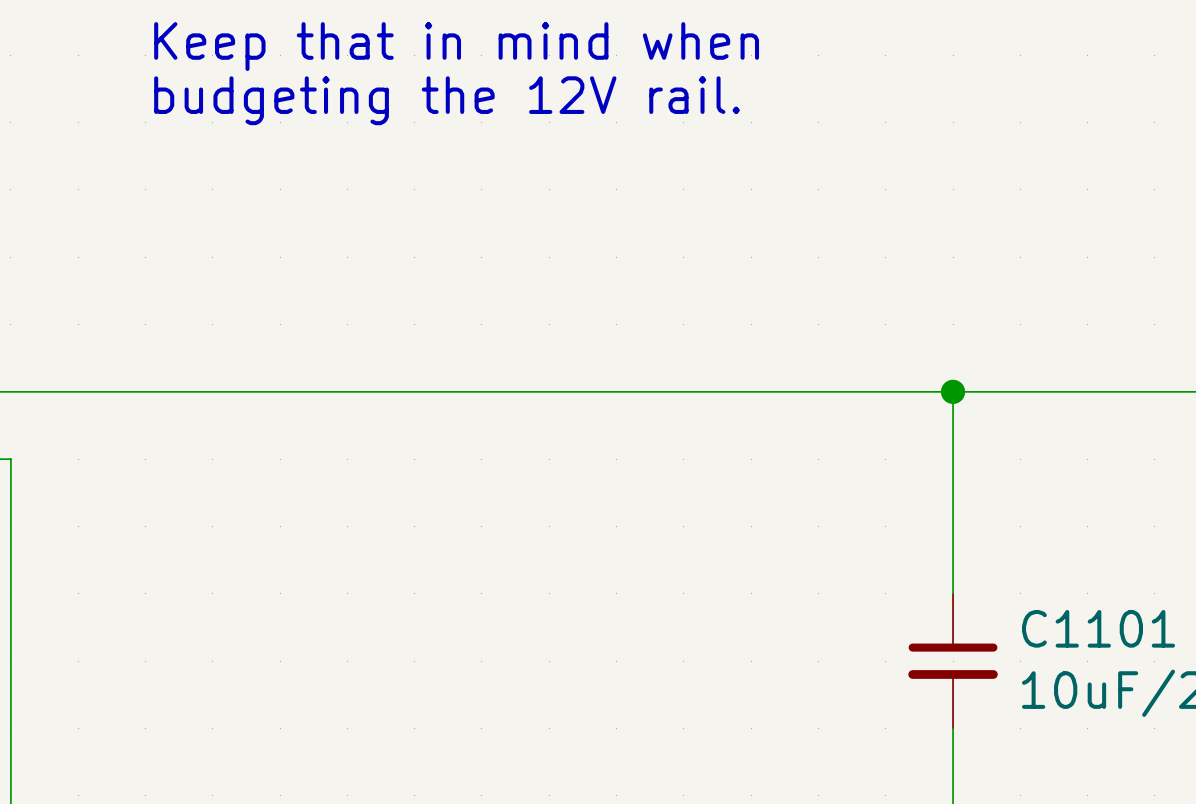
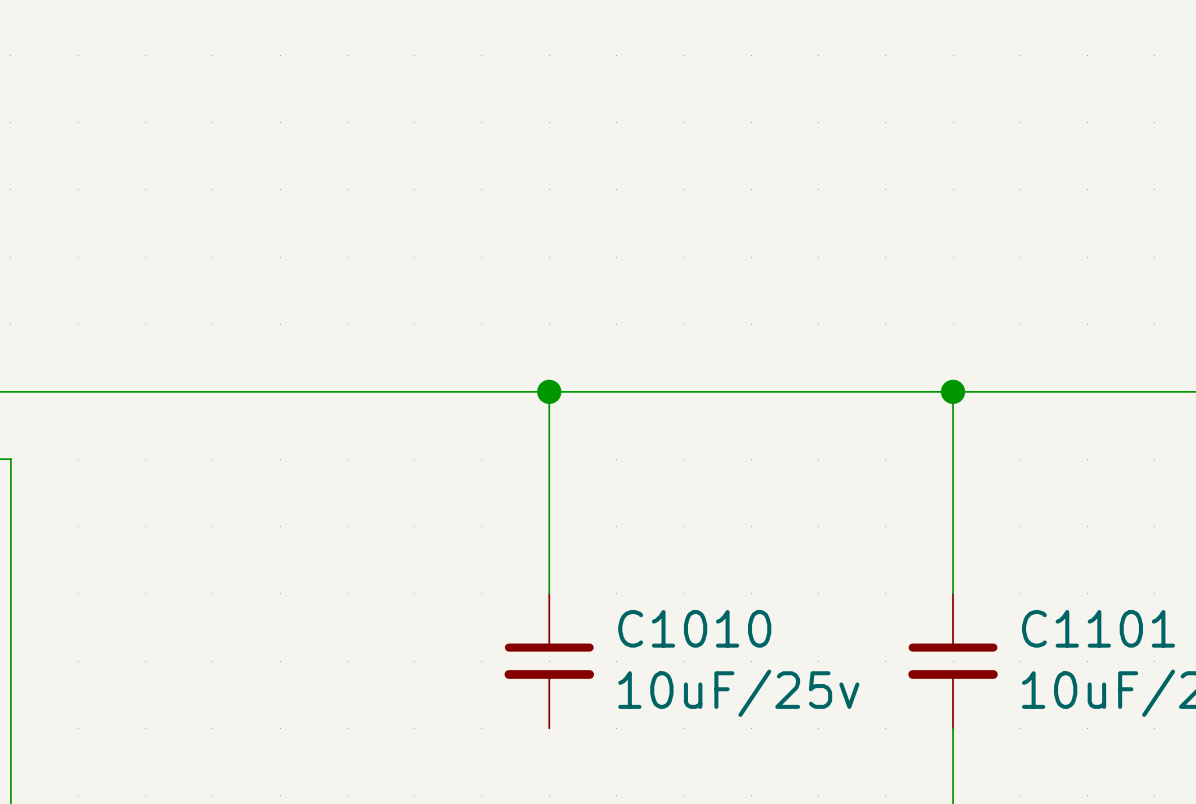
text: Keep that in mind when (456, 46) -> none
text: budgeting the 12V rail. (446, 100) -> none
wire: none -> (549, 391) (549, 593)
junction: none -> (549, 391)
C1010: none -> 10uF/25v (549, 661)

